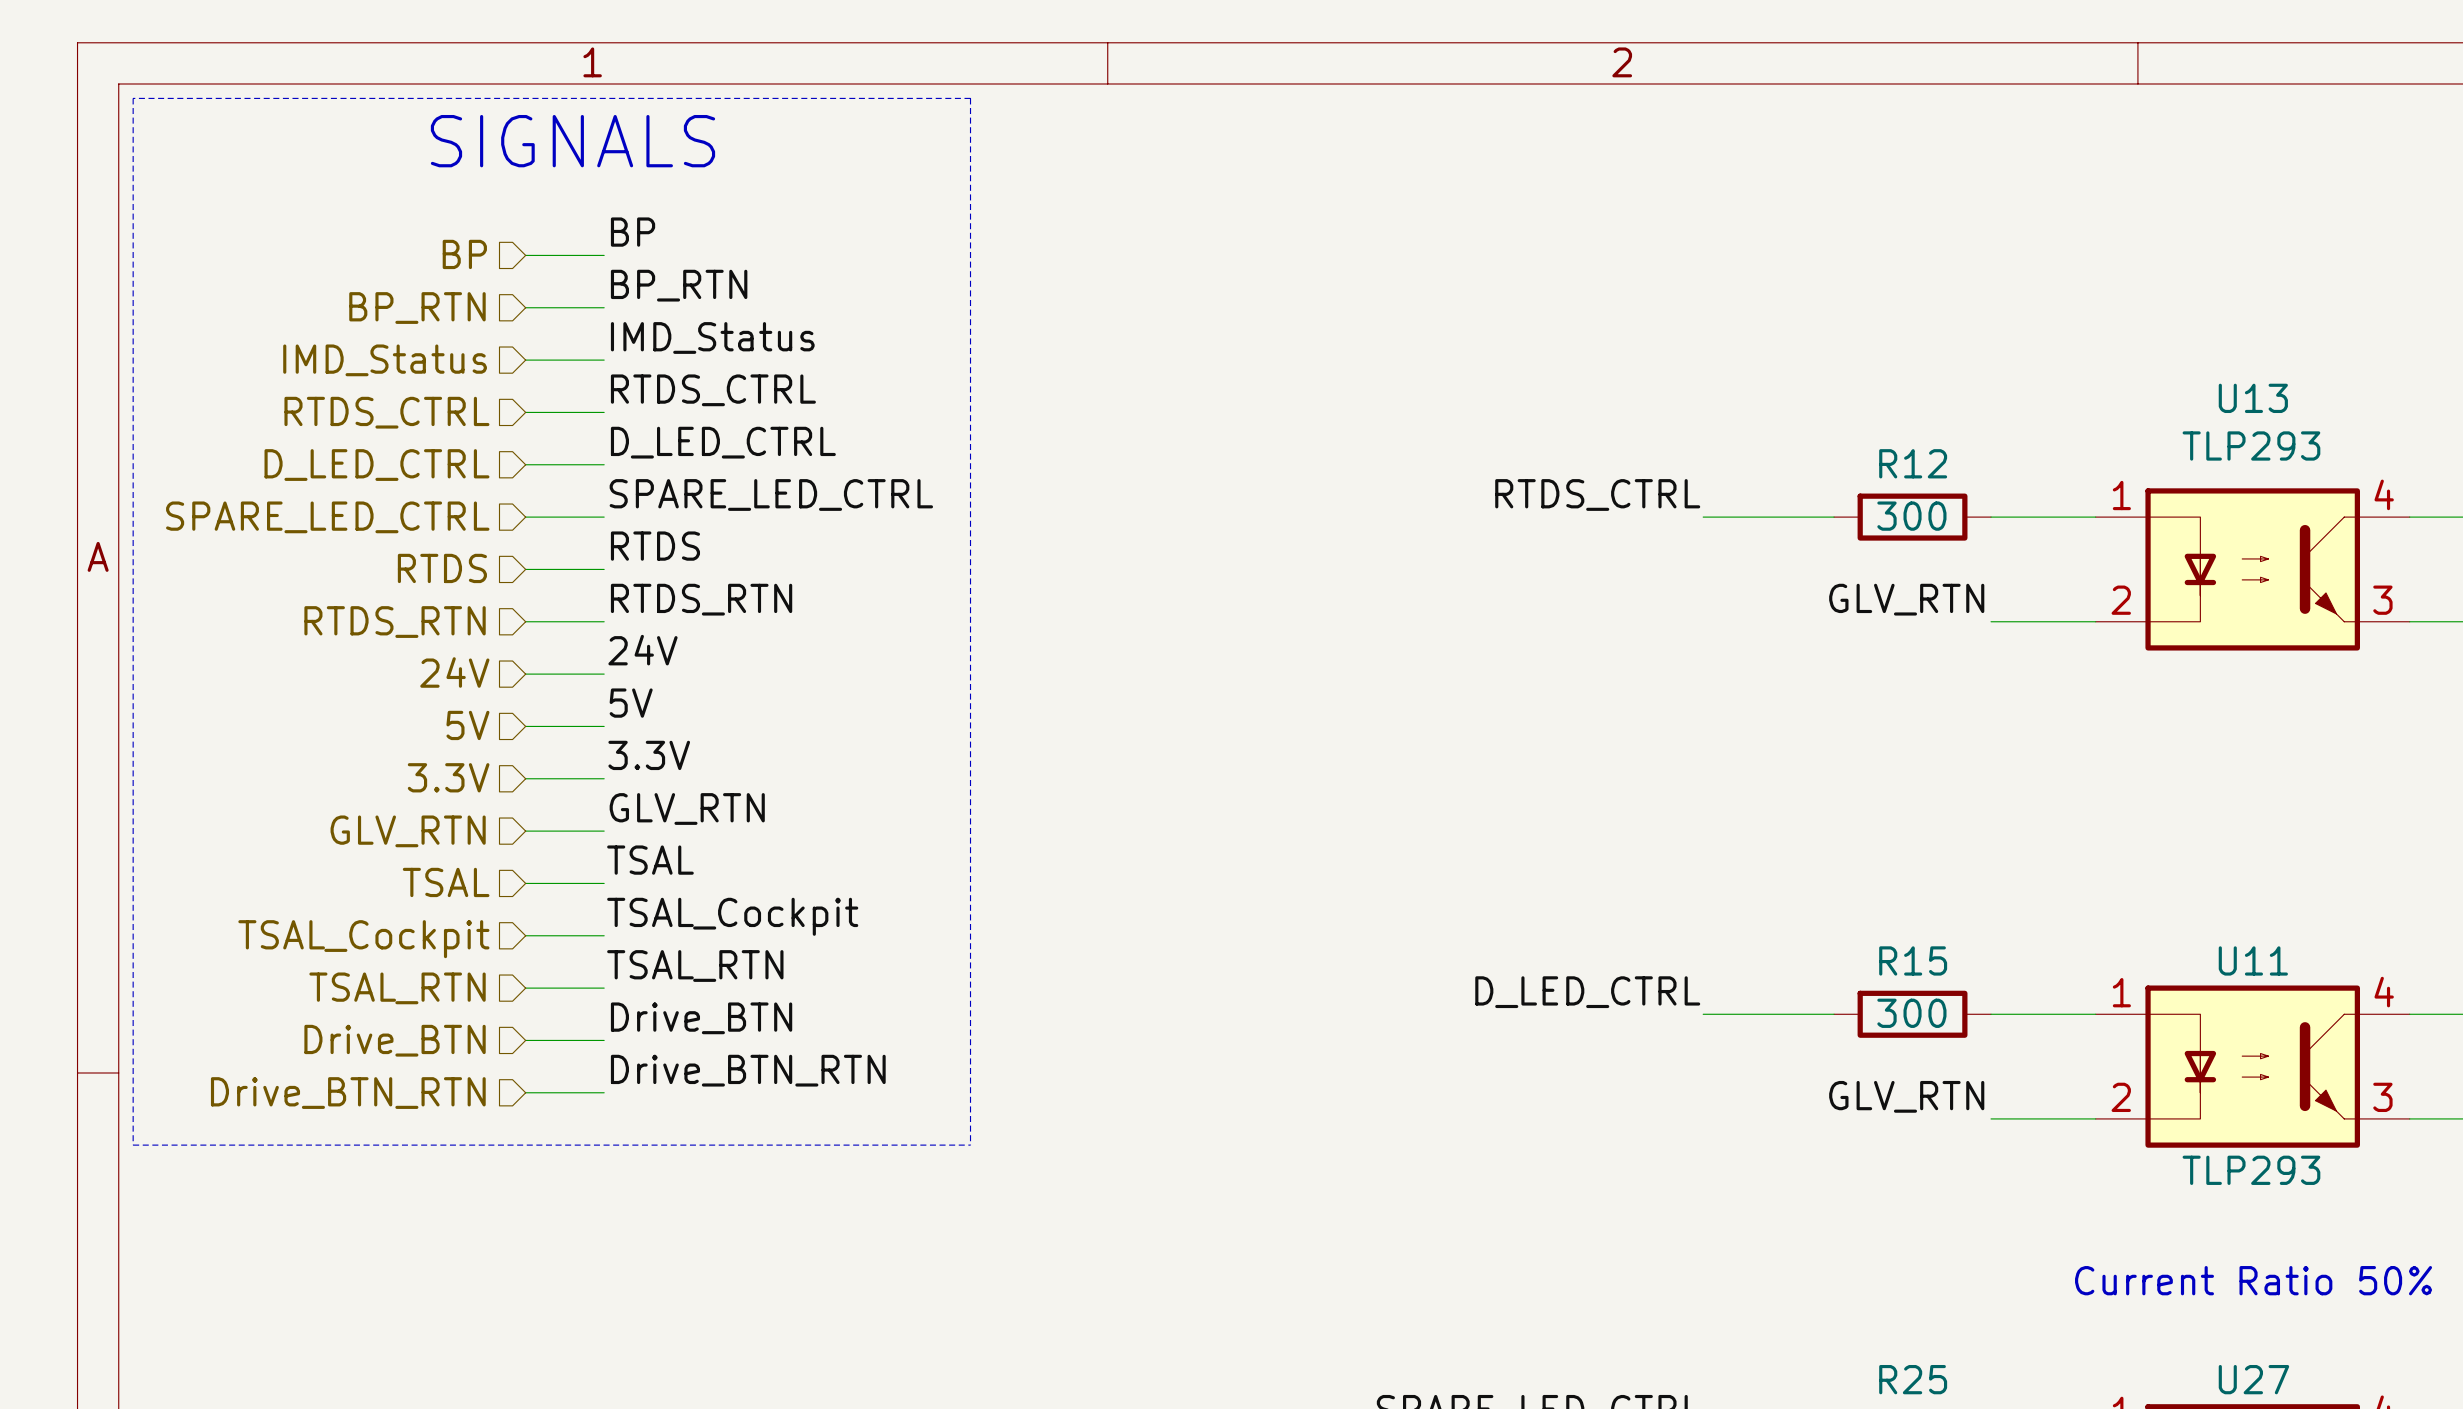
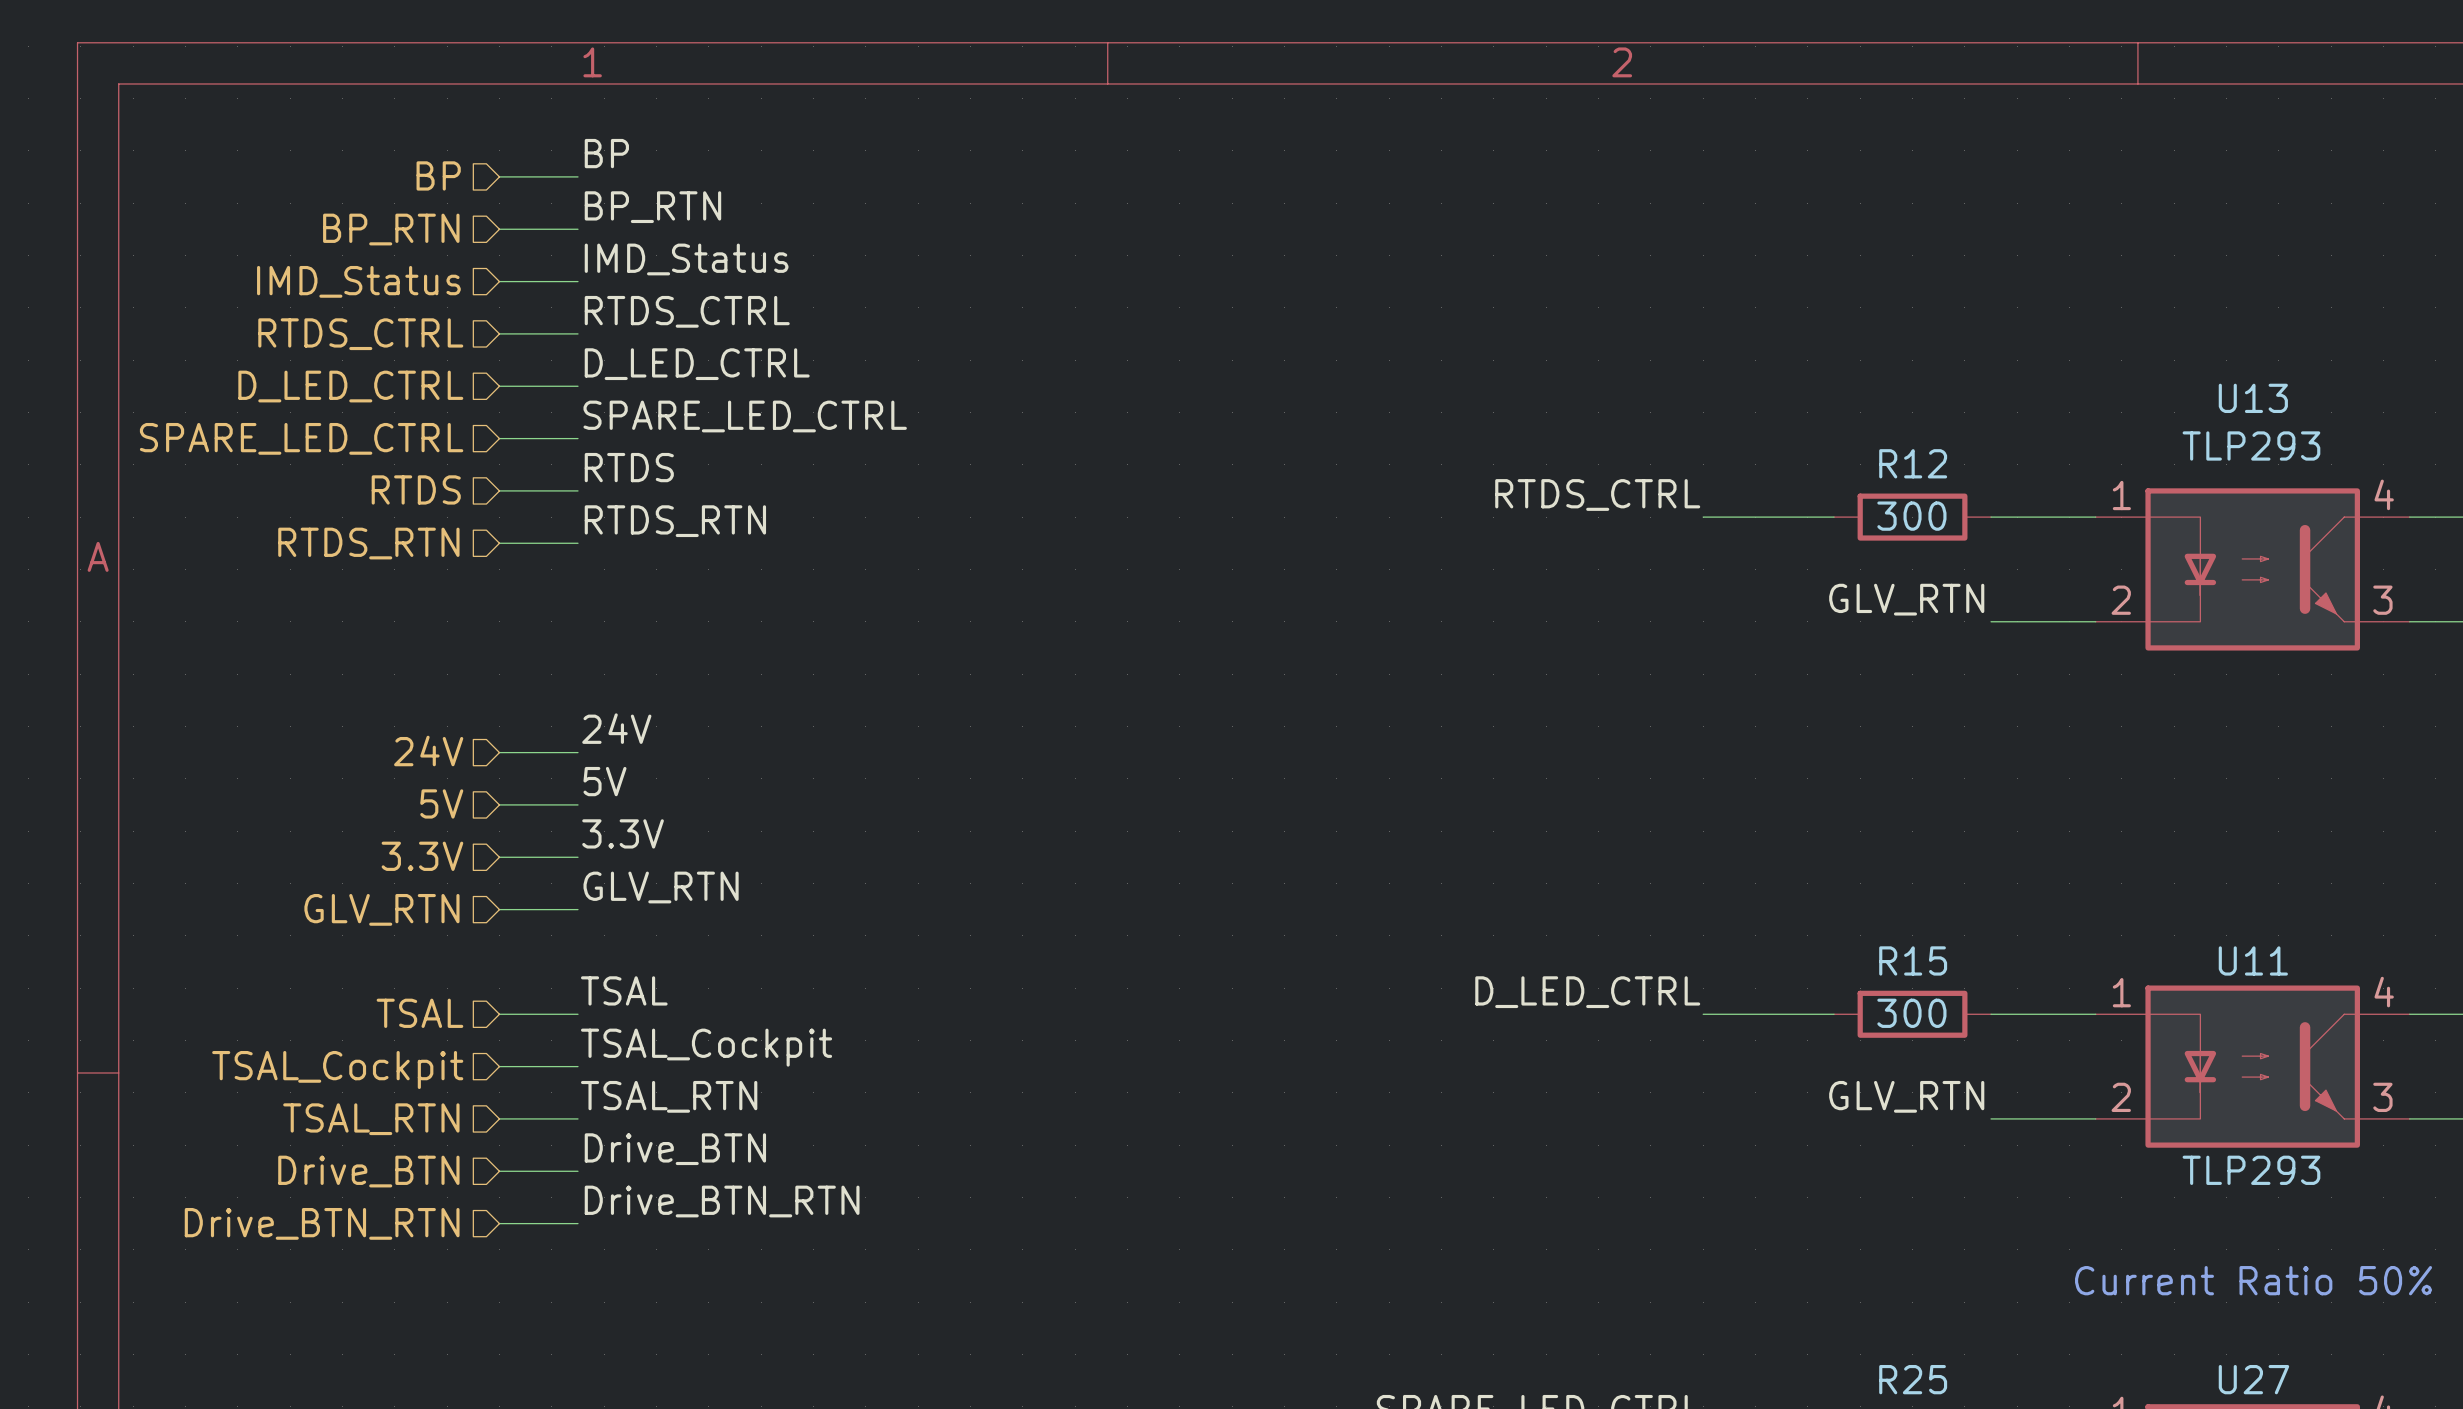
line: (133, 98) (970, 98) (970, 1145) (133, 1145) (133, 98) -> none
text: SIGNALS (572, 141) -> none
label position: BP (633, 232) -> BP (606, 153)
hierarchical label position: BP (464, 254) -> BP (438, 175)
wire: (525, 255) (604, 255) -> (499, 229) (578, 229)
label position: BP_RTN (679, 285) -> BP_RTN (652, 207)
wire: (525, 307) (604, 307) -> (499, 281) (578, 281)
hierarchical label position: BP_RTN (417, 308) -> BP_RTN (391, 229)
label position: IMD_Status (712, 337) -> IMD_Status (686, 259)
hierarchical label position: IMD_Status (385, 360) -> IMD_Status (358, 281)
wire: (525, 360) (604, 360) -> (499, 333) (578, 333)
label position: RTDS_CTRL (713, 390) -> RTDS_CTRL (687, 311)
hierarchical label position: RTDS_CTRL (386, 412) -> RTDS_CTRL (360, 334)
wire: (525, 412) (604, 412) -> (499, 386) (578, 386)
label position: D_LED_CTRL (723, 442) -> D_LED_CTRL (697, 364)
wire: (525, 464) (604, 464) -> (499, 438) (578, 438)
hierarchical label position: D_LED_CTRL (376, 465) -> D_LED_CTRL (350, 386)
label position: SPARE_LED_CTRL (771, 494) -> SPARE_LED_CTRL (745, 416)
hierarchical label position: SPARE_LED_CTRL (327, 517) -> SPARE_LED_CTRL (301, 438)
wire: (525, 517) (604, 517) -> (499, 543) (578, 543)
label position: RTDS (655, 546) -> RTDS (629, 467)
hierarchical label position: RTDS (442, 568) -> RTDS (416, 489)
wire: (525, 569) (604, 569) -> (499, 490) (578, 490)
label position: RTDS_RTN (701, 599) -> RTDS_RTN (675, 521)
wire: (525, 621) (604, 621) -> (499, 176) (578, 176)
hierarchical label position: RTDS_RTN (395, 622) -> RTDS_RTN (368, 543)
label position: 24V (642, 650) -> 24V (616, 728)
hierarchical label position: 24V (454, 672) -> 24V (428, 751)
wire: (525, 674) (604, 674) -> none
label position: 5V (631, 703) -> 5V (604, 781)
hierarchical label position: 5V (467, 725) -> 5V (441, 803)
wire: (525, 726) (604, 726) -> (499, 1171) (578, 1171)
label position: 3.3V (649, 755) -> 3.3V (623, 833)
hierarchical label position: 3.3V (448, 777) -> 3.3V (422, 856)
wire: (525, 778) (604, 778) -> (499, 752) (578, 752)
label position: GLV_RTN (687, 809) -> GLV_RTN (661, 887)
hierarchical label position: GLV_RTN (408, 831) -> GLV_RTN (381, 909)
wire: (525, 831) (604, 831) -> (499, 804) (578, 804)
label position: TSAL (650, 860) -> TSAL (624, 990)
hierarchical label position: TSAL (446, 882) -> TSAL (419, 1013)
wire: (525, 883) (604, 883) -> (499, 857) (578, 857)
label position: TSAL_Cockpit (732, 916) -> TSAL_Cockpit (706, 1047)
wire: (525, 935) (604, 935) -> (499, 909) (578, 909)
hierarchical label position: TSAL_Cockpit (363, 939) -> TSAL_Cockpit (337, 1069)
label position: TSAL_RTN (695, 966) -> TSAL_RTN (669, 1096)
hierarchical label position: TSAL_RTN (397, 988) -> TSAL_RTN (371, 1119)
wire: (525, 988) (604, 988) -> (499, 1014) (578, 1014)
label position: Drive_BTN (701, 1018) -> Drive_BTN (675, 1149)
hierarchical label position: Drive_BTN (395, 1040) -> Drive_BTN (368, 1171)
wire: (525, 1040) (604, 1040) -> (499, 1066) (578, 1066)
label position: Drive_BTN_RTN (748, 1070) -> Drive_BTN_RTN (722, 1201)
wire: (525, 1092) (604, 1092) -> (499, 1118) (578, 1118)
hierarchical label position: Drive_BTN_RTN (348, 1093) -> Drive_BTN_RTN (322, 1223)
wire: none -> (499, 1223) (578, 1223)

